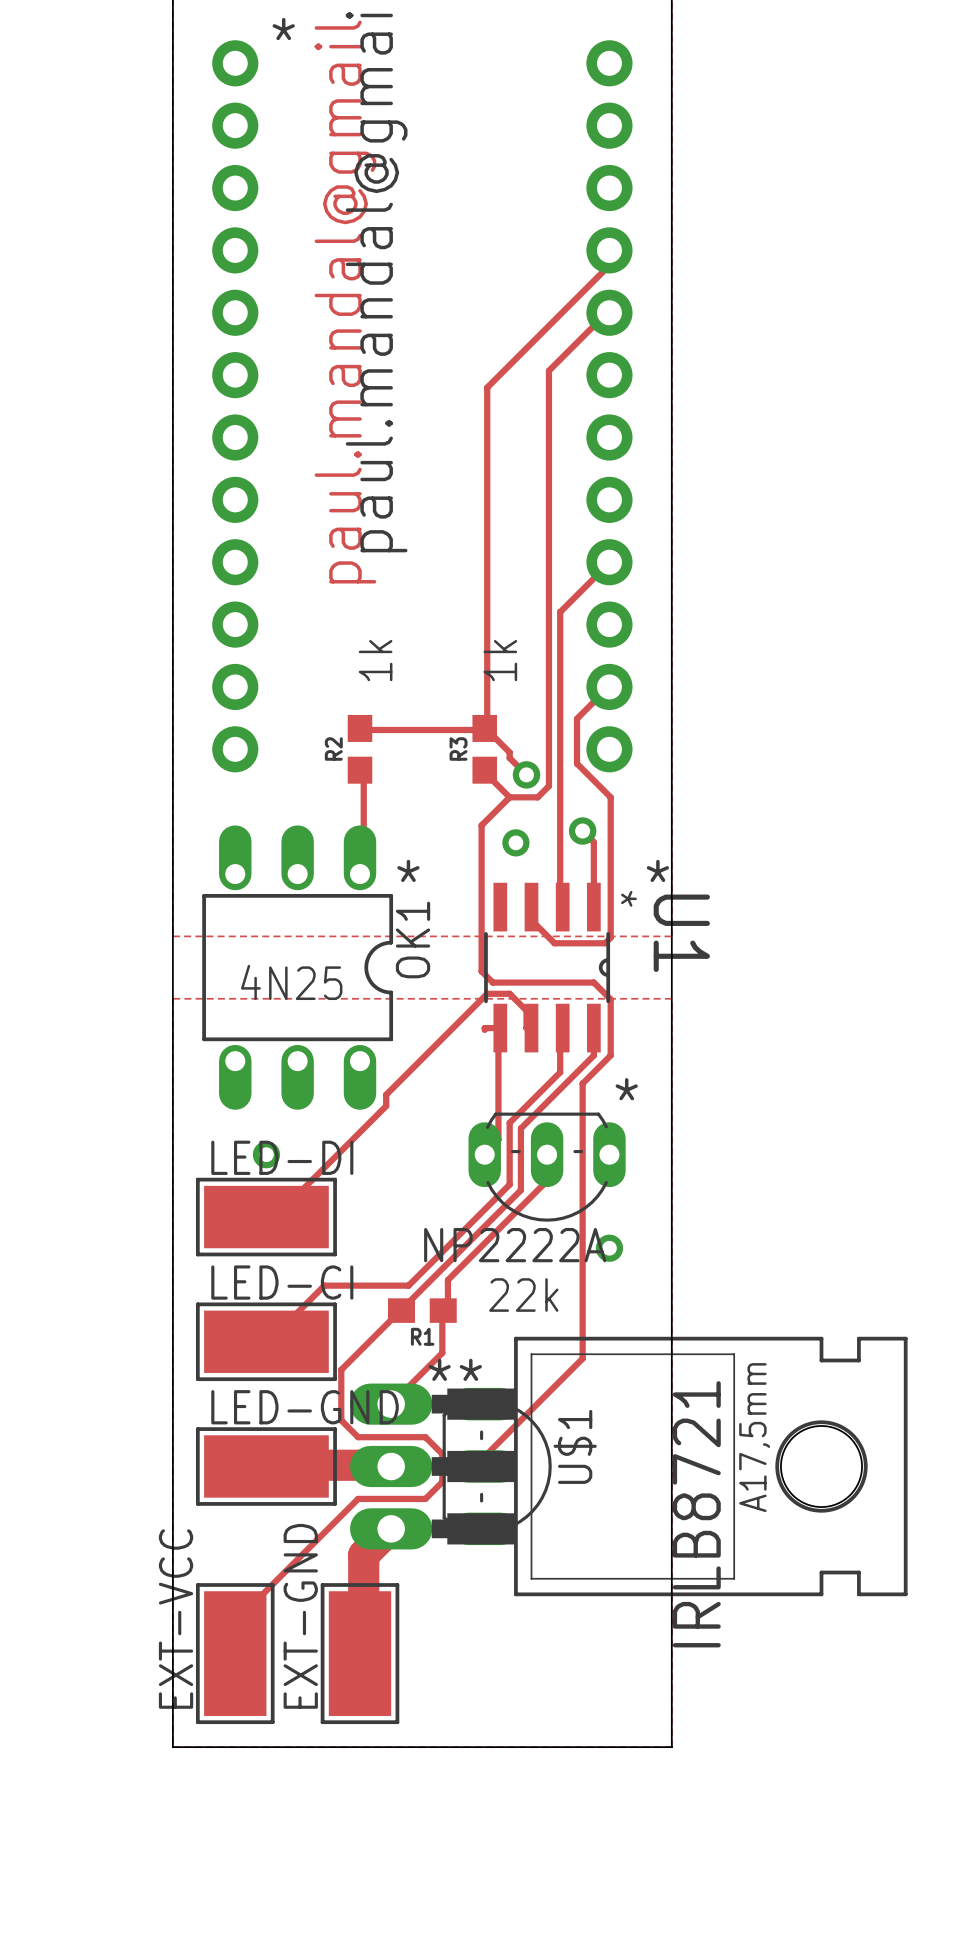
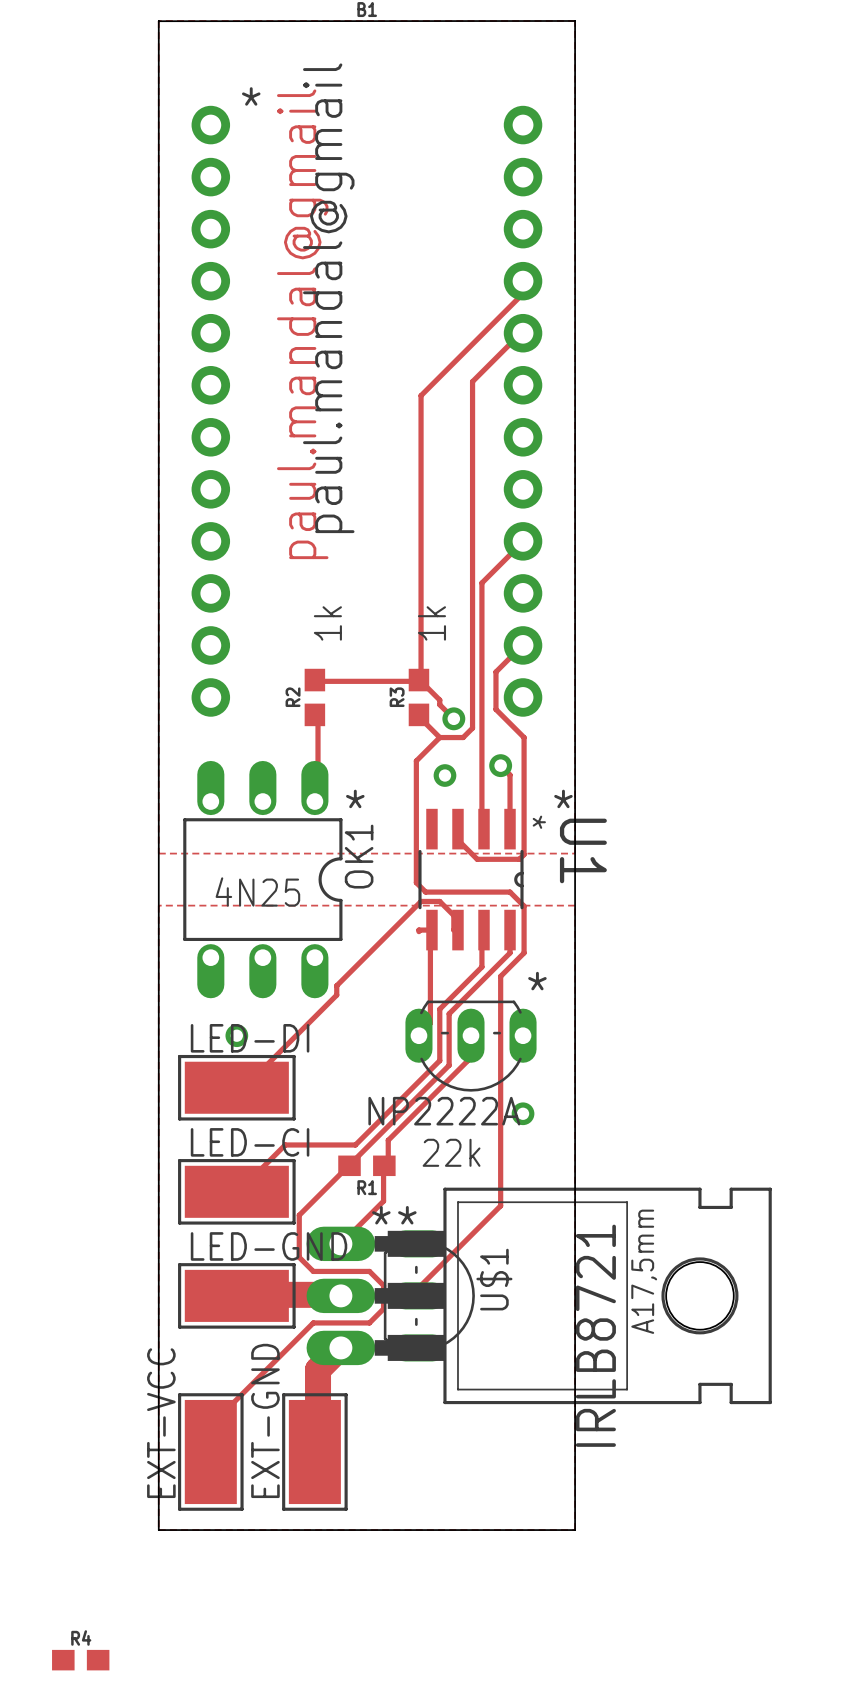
R4: none -> (80, 1660)

